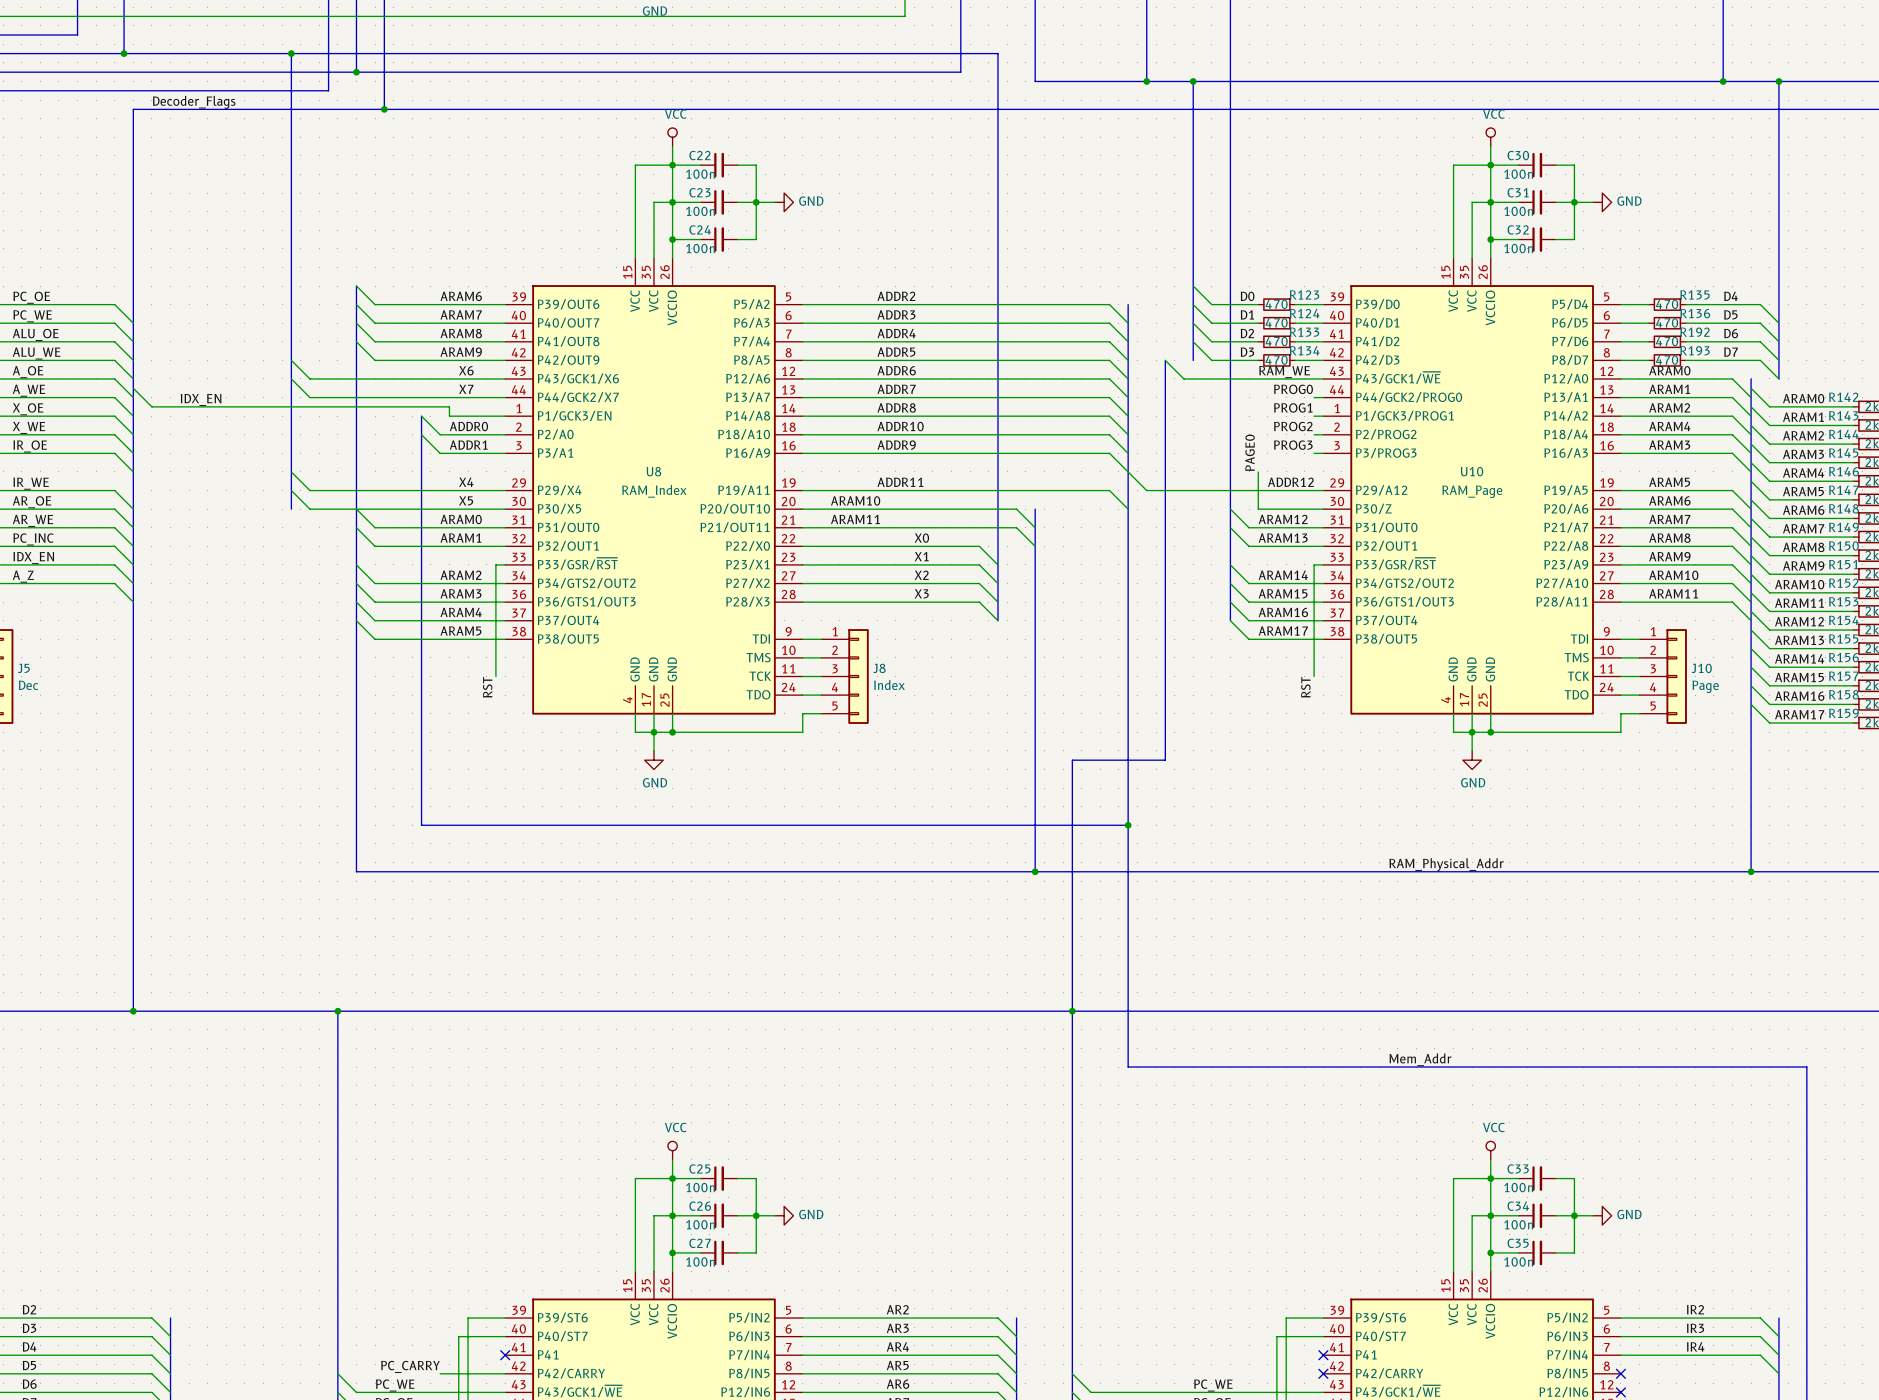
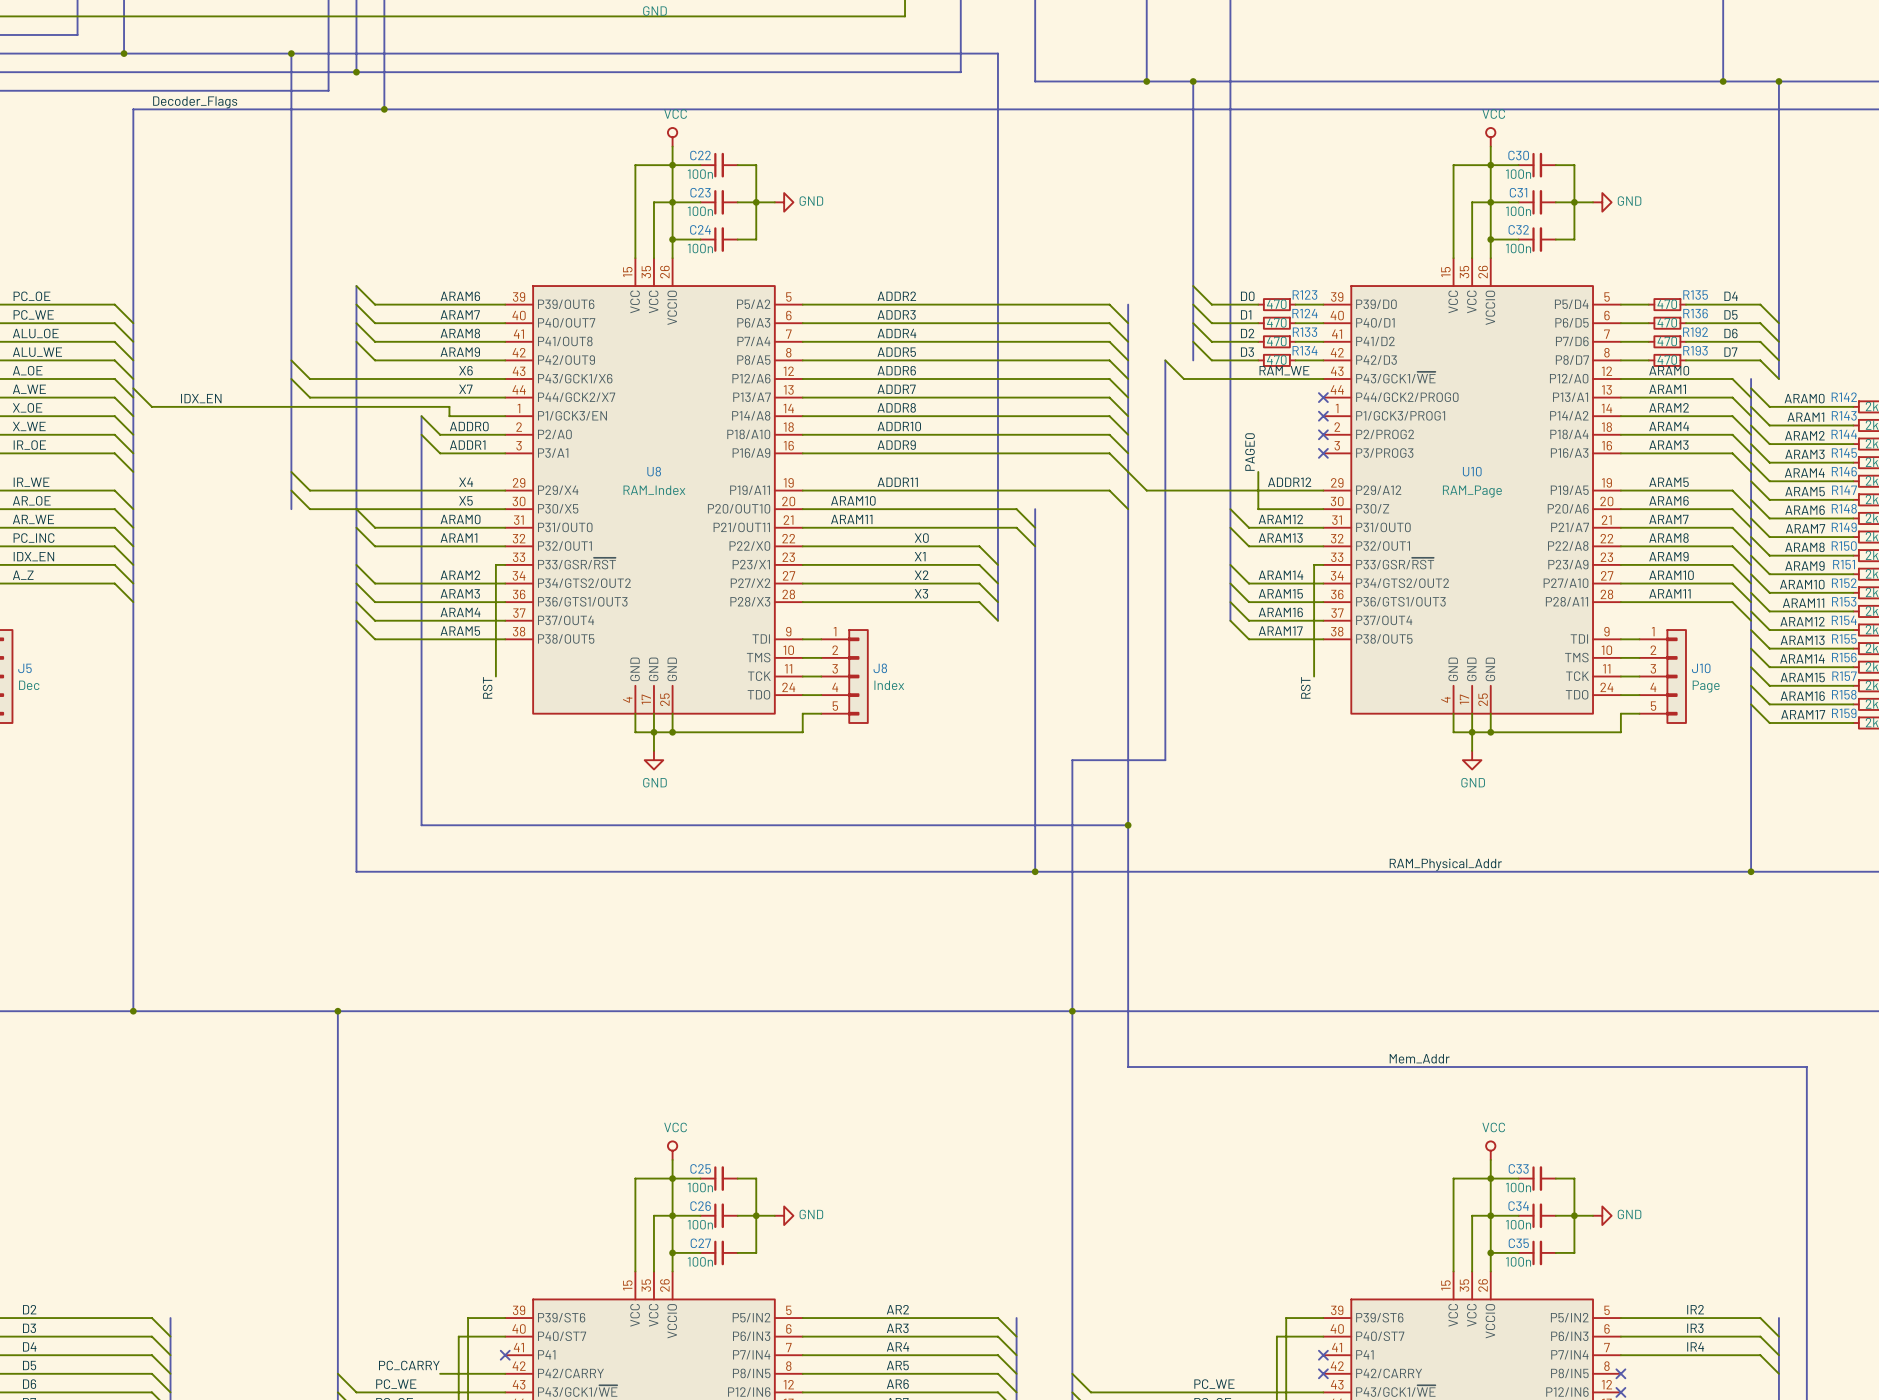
label: PROG0 (1293, 389) -> none
wire: (1314, 397) (1323, 397) -> none
no-connect mark: none -> (1323, 397)
label: PROG1 (1293, 407) -> none
wire: (1314, 416) (1323, 416) -> none
no-connect mark: none -> (1323, 416)
label: PROG2 (1293, 426) -> none
wire: (1314, 434) (1323, 434) -> none
no-connect mark: none -> (1323, 434)
label: PROG3 (1293, 445) -> none
wire: (1314, 453) (1323, 453) -> none
no-connect mark: none -> (1323, 453)

